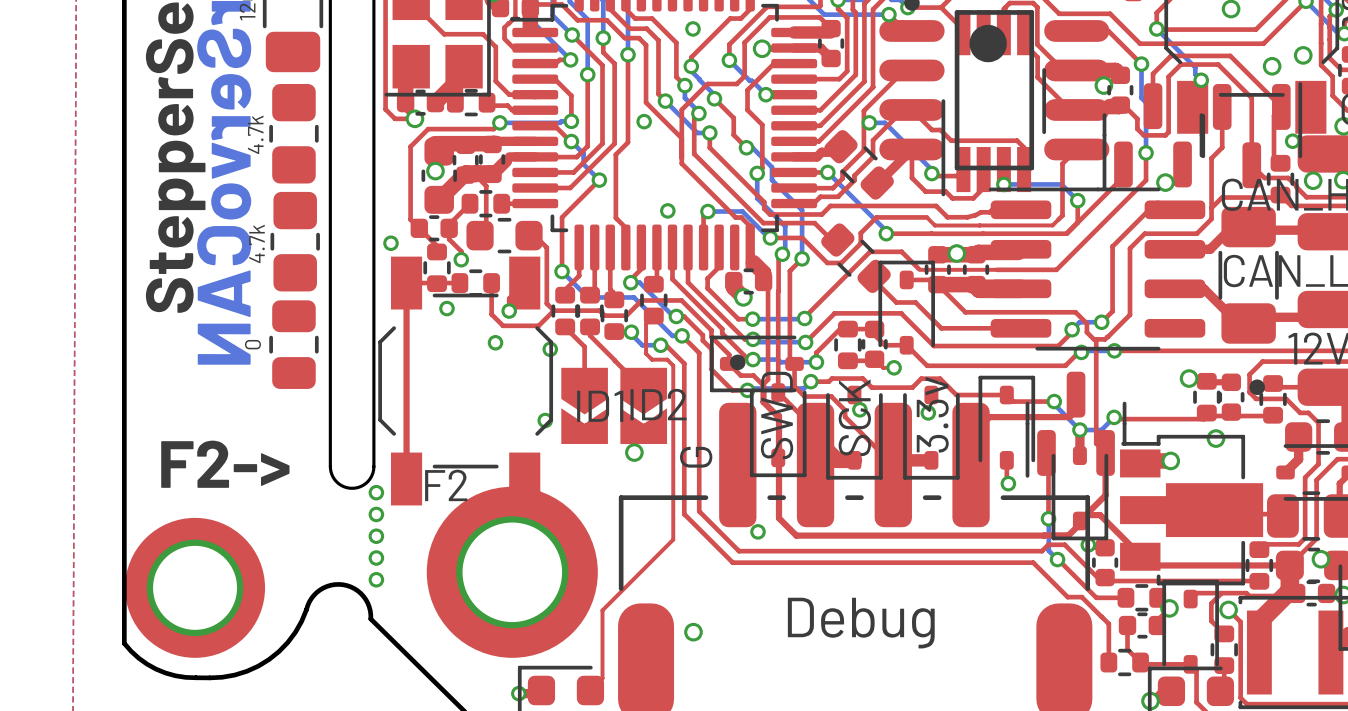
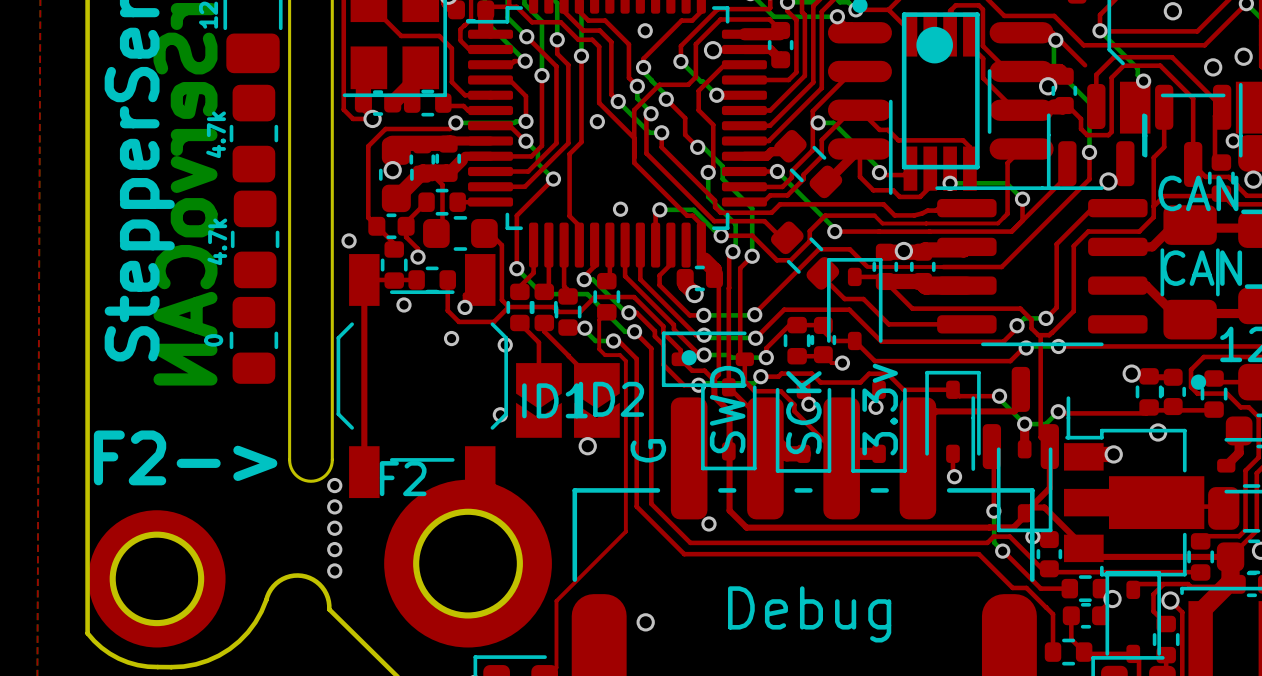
bottom track: (1141, 64) (1141, 97) -> (1055, 40) (1053, 42) (1053, 67) (1085, 98)
via position: (1141, 64) -> (1055, 40)

